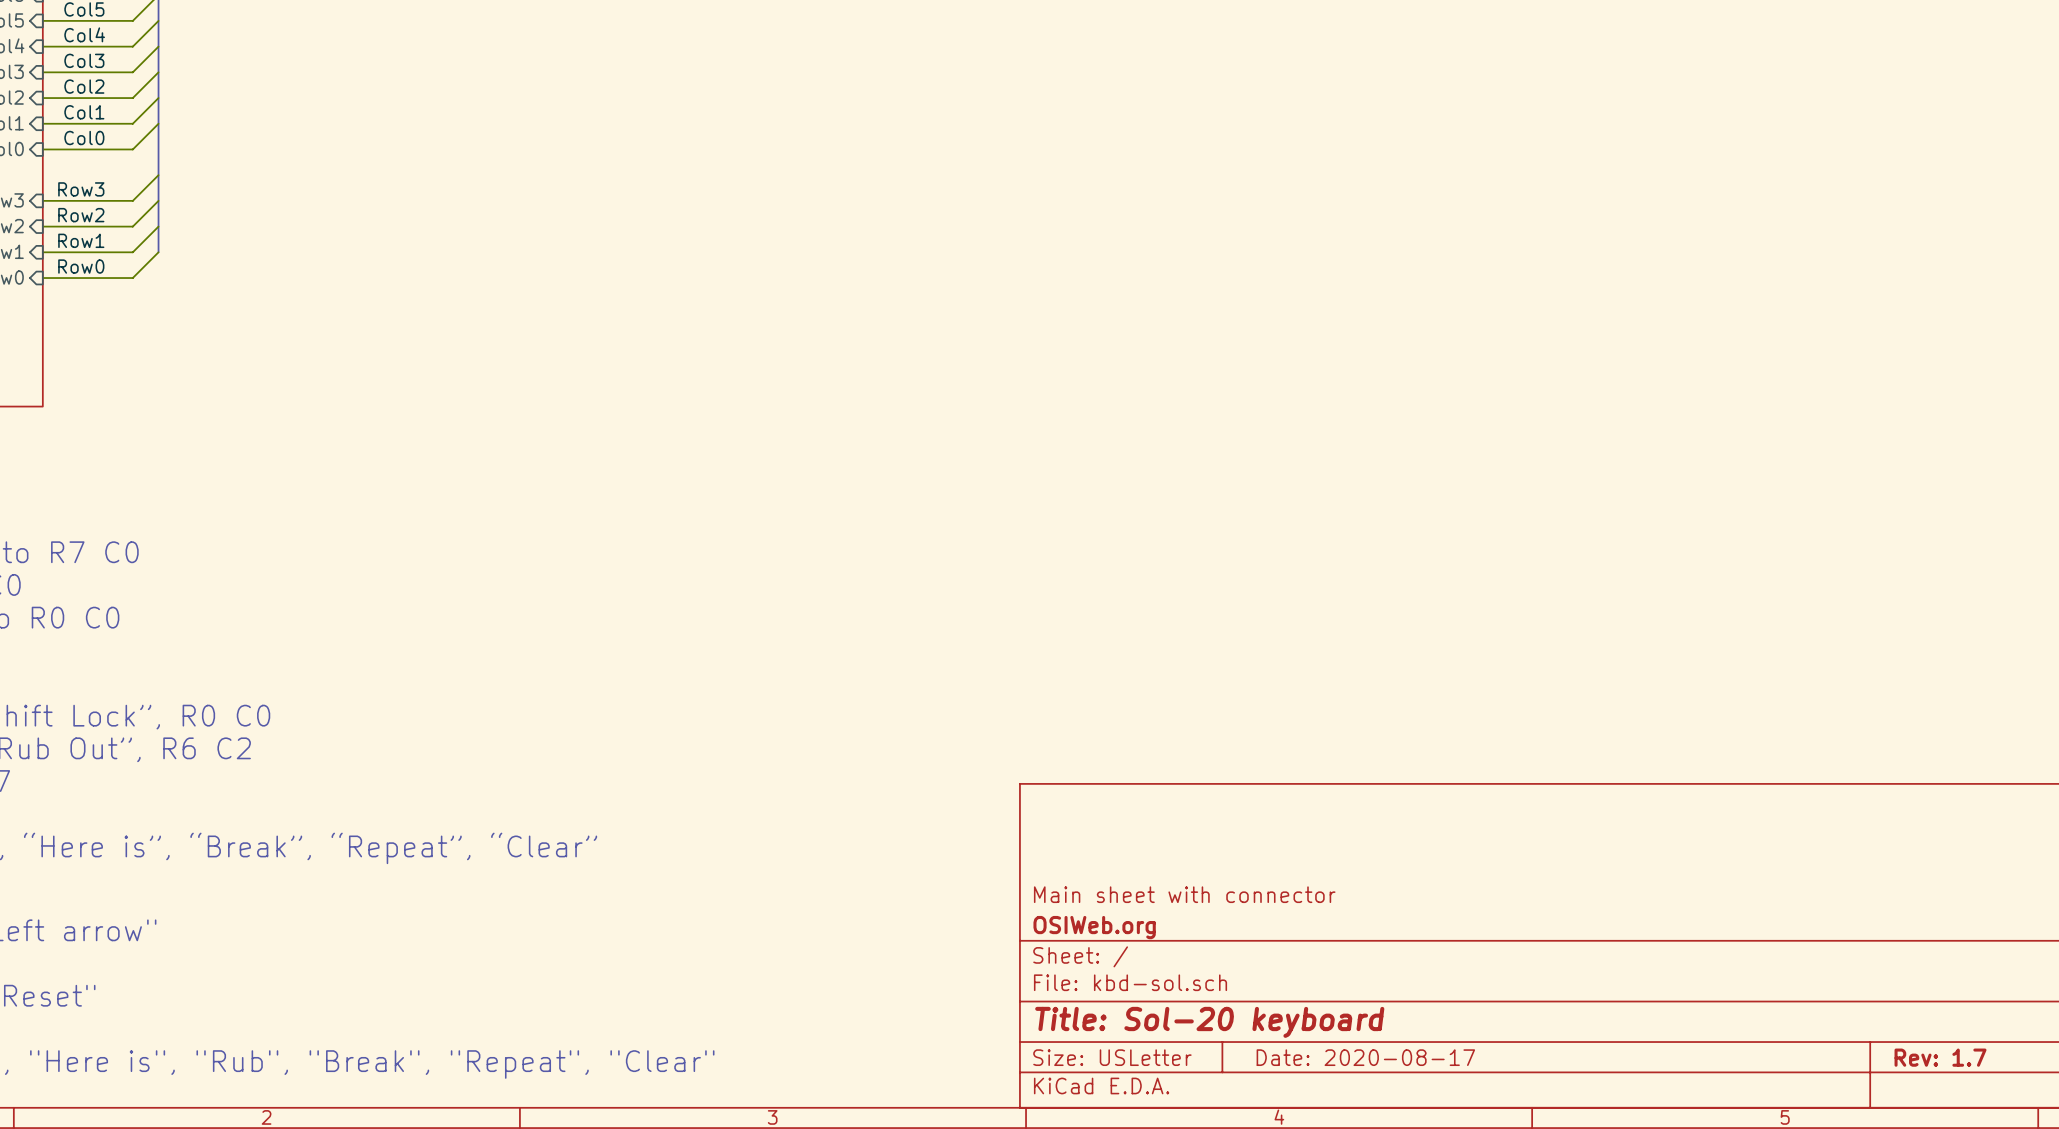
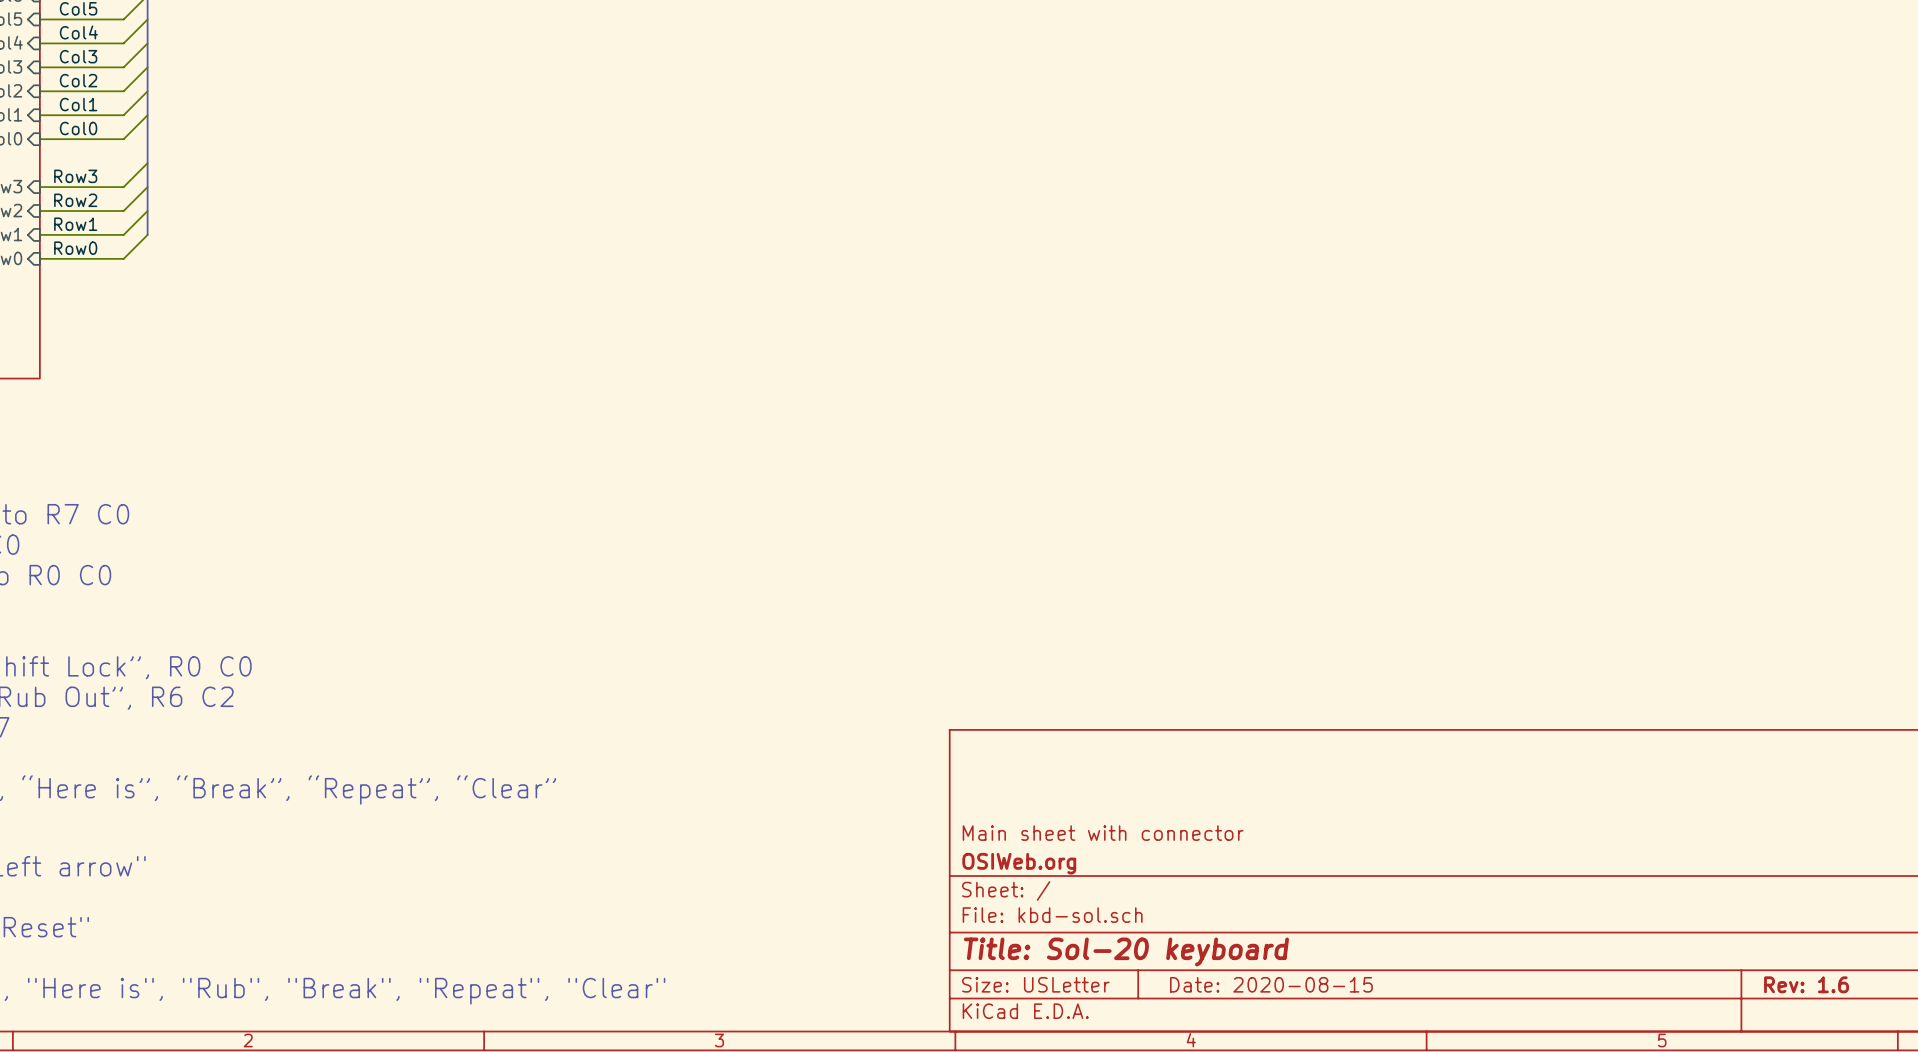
title block: Date: 2020-08-17 (1365, 1057) -> Date: 2020-08-15 (1271, 984)
title block: Rev: 1.7 (1940, 1057) -> Rev: 1.6 (1806, 984)

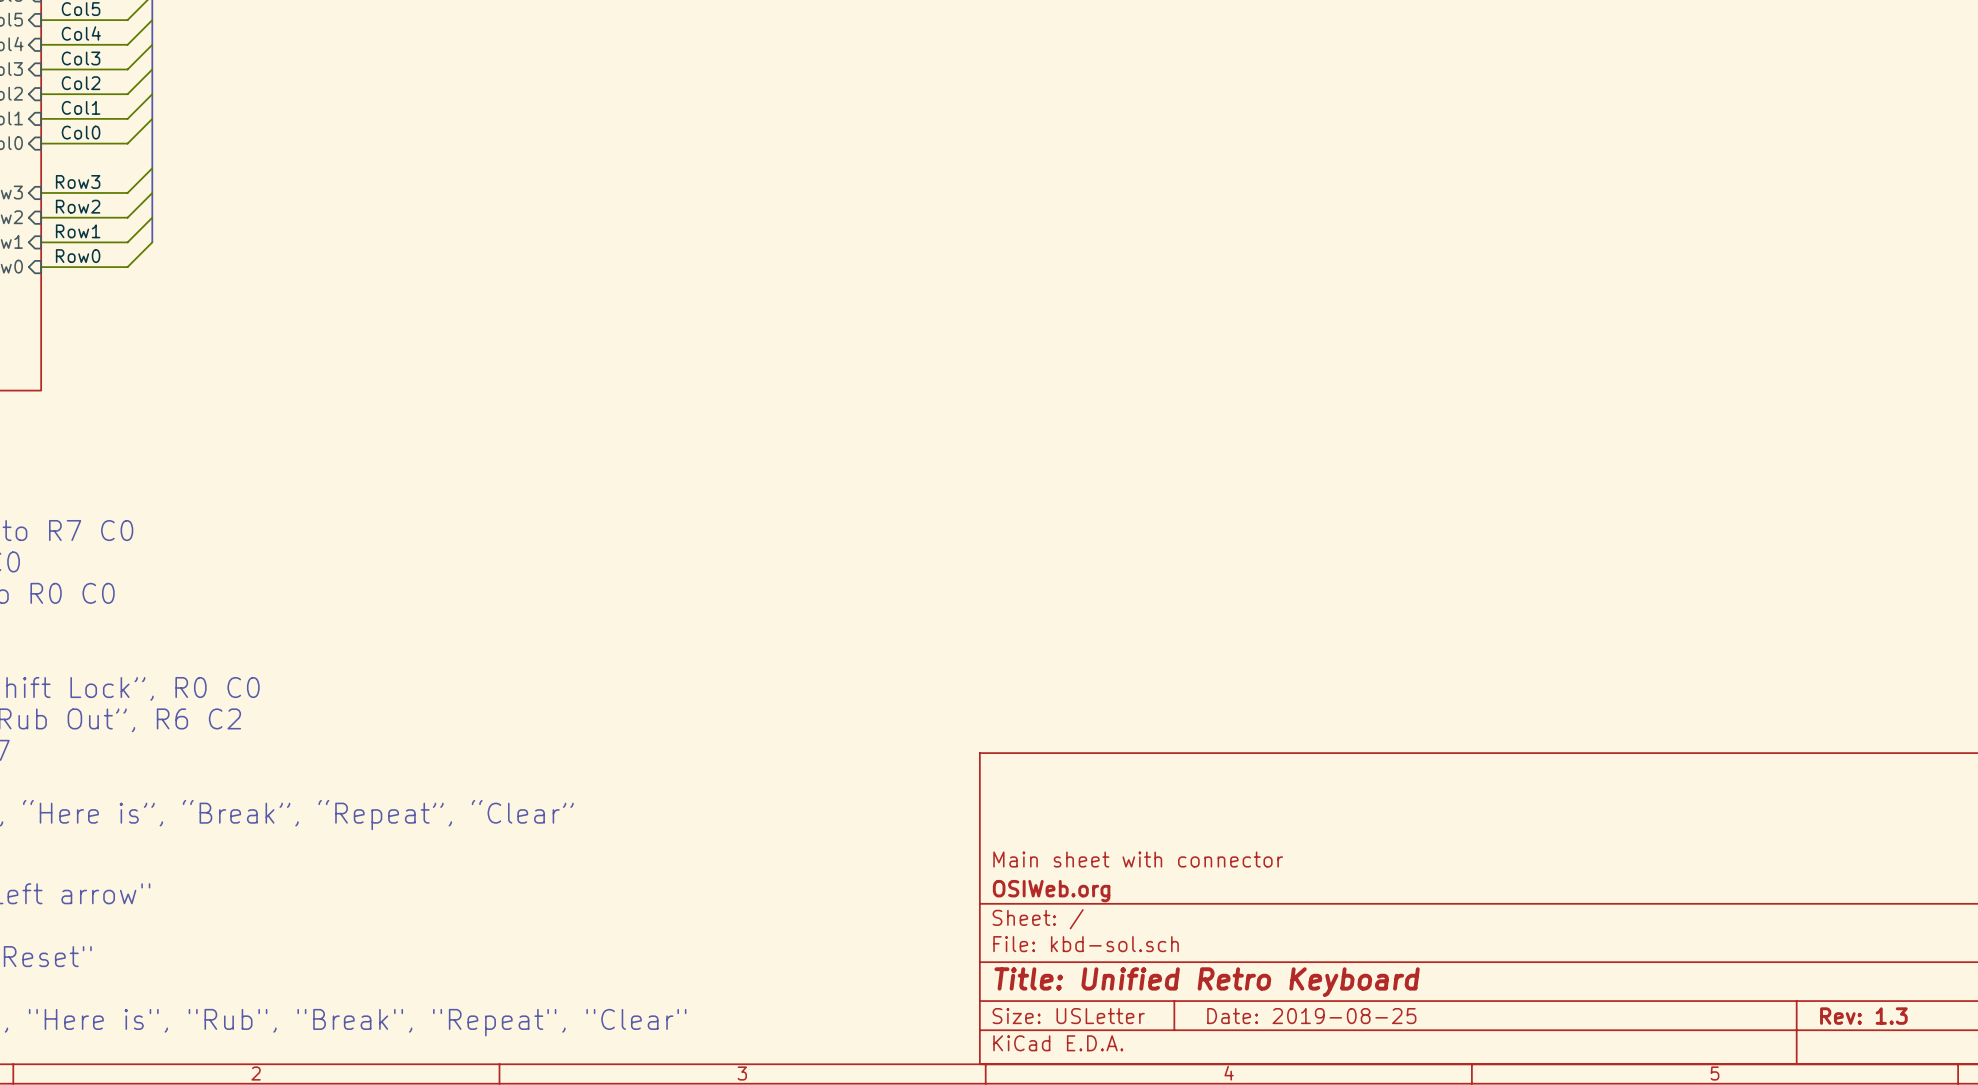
title block: Title: Sol-20 keyboard (1126, 951) -> Title: Unified Retro Keyboard (1207, 982)
title block: Date: 2020-08-15 (1271, 984) -> Date: 2019-08-25 (1311, 1016)
title block: Rev: 1.6 (1806, 984) -> Rev: 1.3 (1863, 1016)

